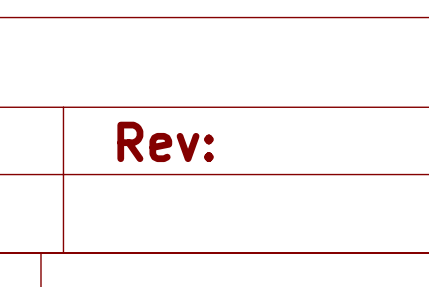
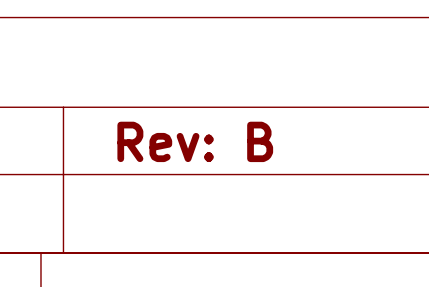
title block: Rev: (165, 141) -> Rev: B (195, 141)

